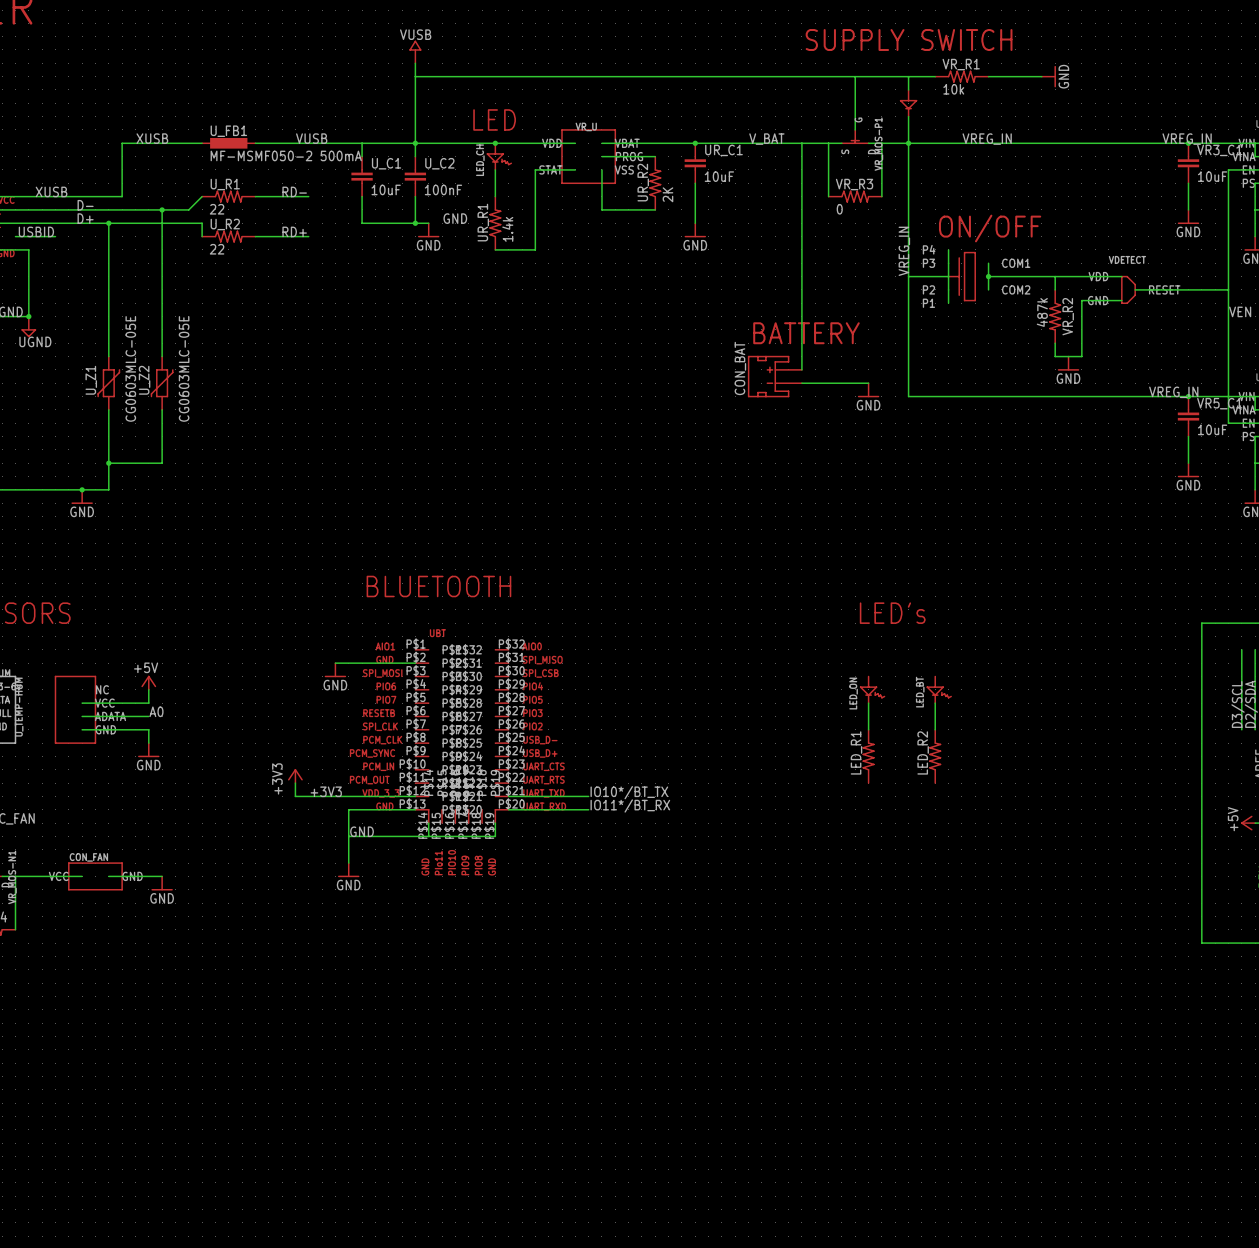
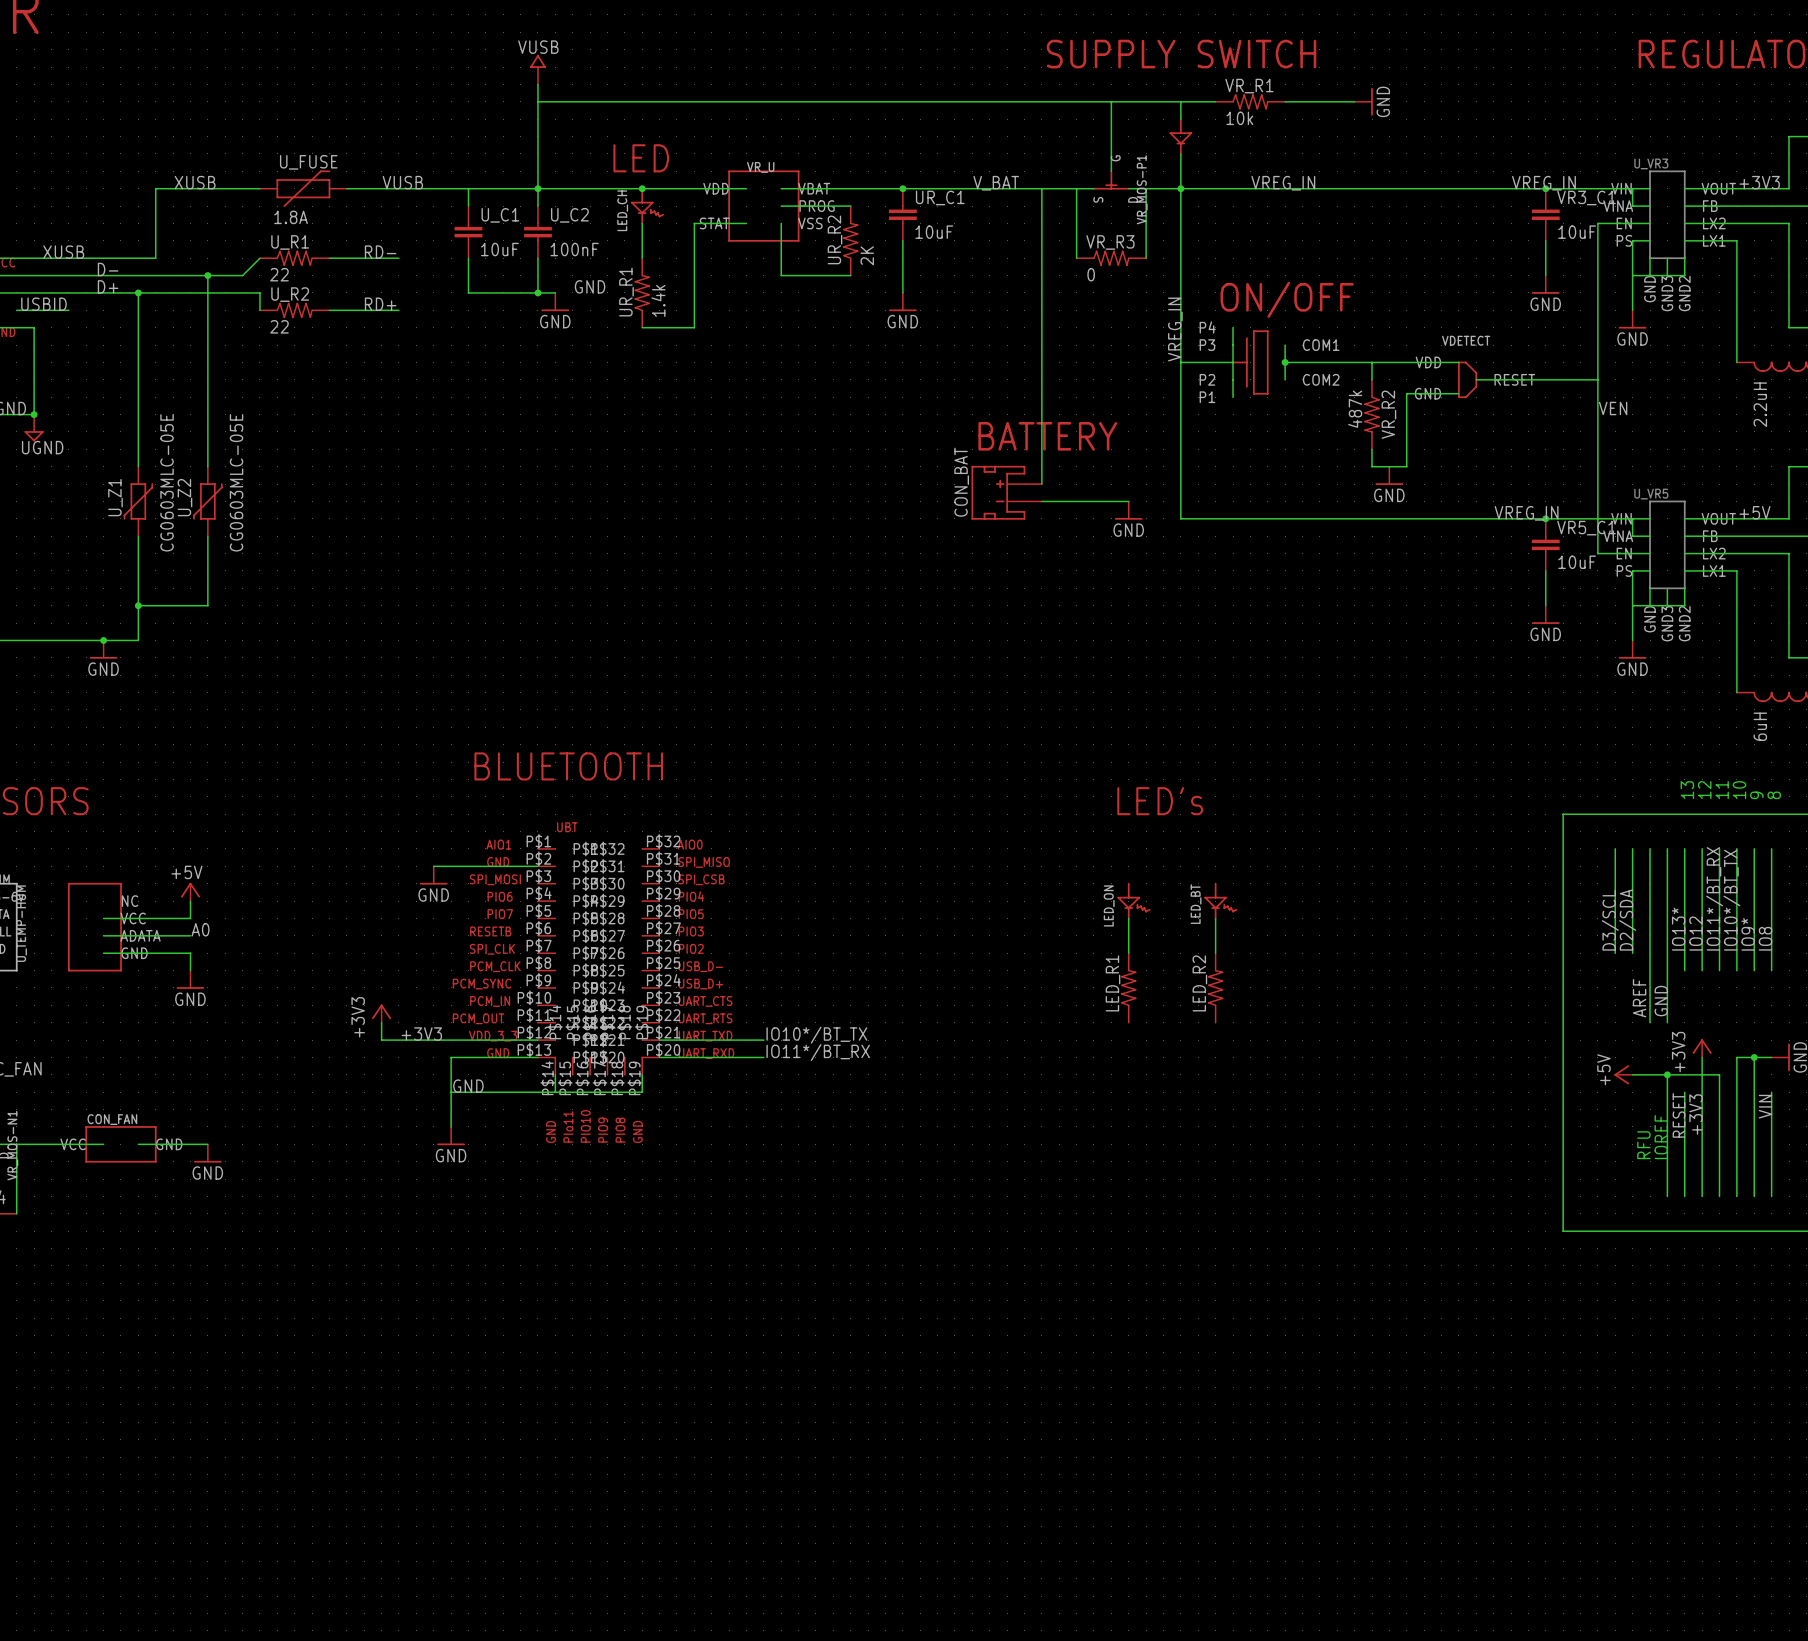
U_FB1: MF-MSMF050-2 500mA (228, 143) -> none
U_FUSE: none -> 1.8A (303, 188)

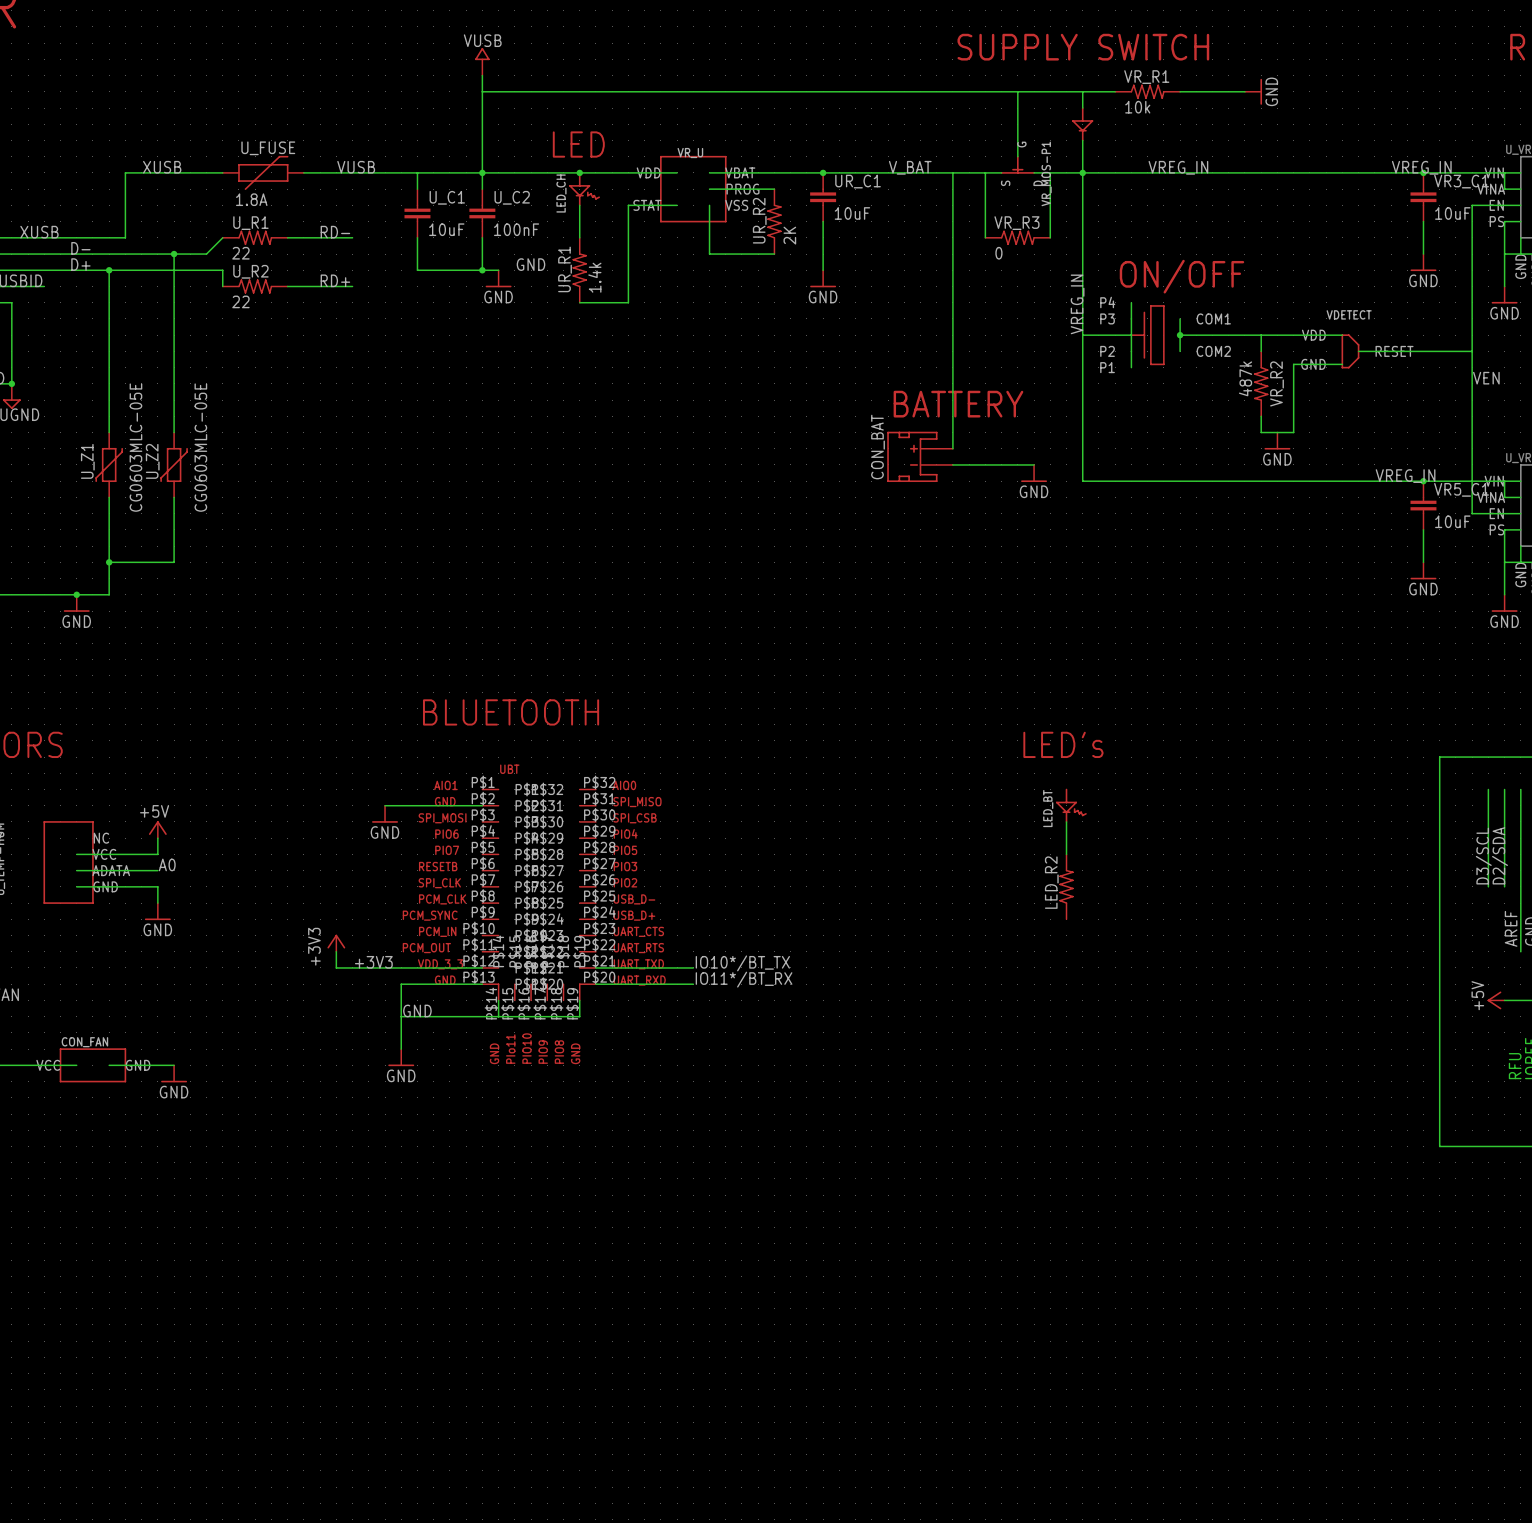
LED_ON: (1133, 901) -> none
LED_BT position: (1220, 901) -> (1071, 805)
wire: (1128, 918) (1128, 953) -> (1066, 821) (1066, 854)
wire: (1215, 918) (1215, 953) -> none
LED_R1: (1128, 987) -> none
LED_R2 position: (1215, 987) -> (1066, 886)

